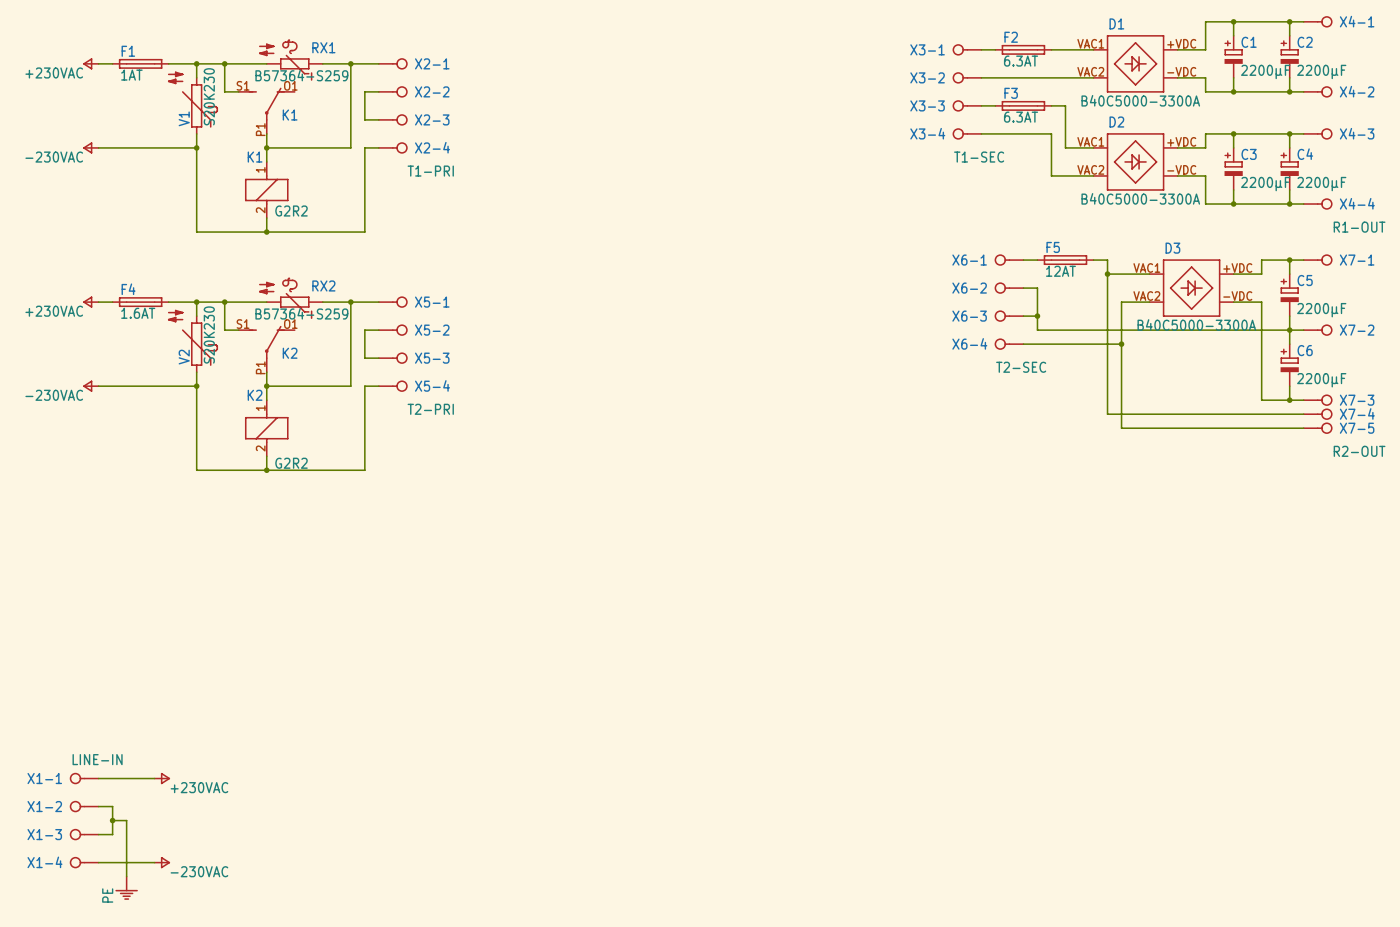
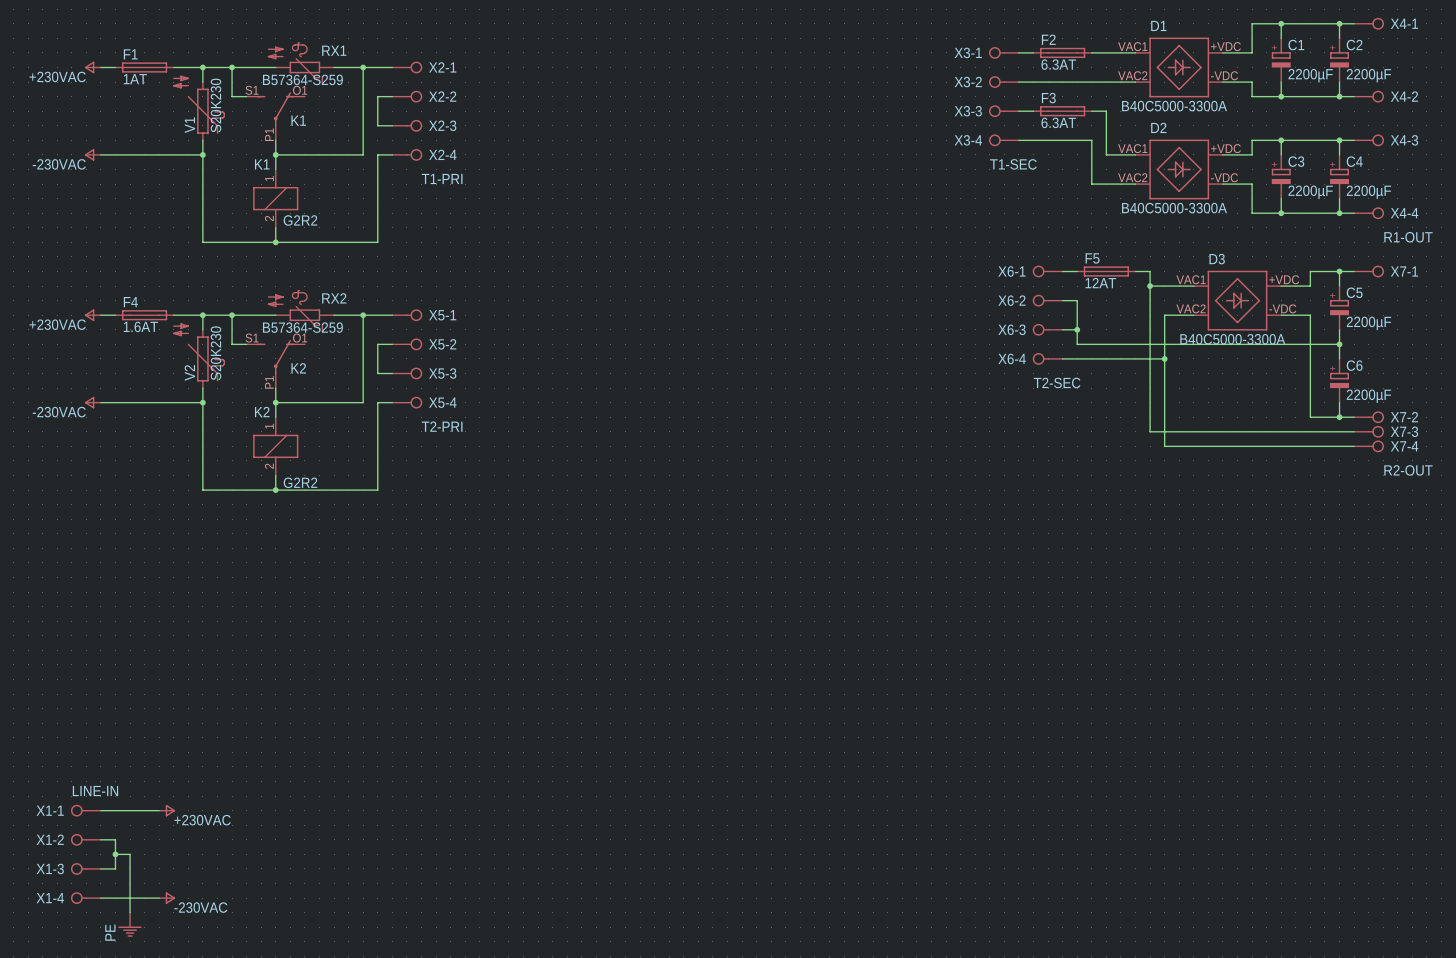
wire: (1289, 330) (1303, 330) -> none
X7-2: (1318, 330) -> none
X7-3 name: X7-3 (1357, 400) -> X7-2 (1404, 417)
X7-4 name: X7-4 (1357, 413) -> X7-3 (1404, 431)
X7-5 name: X7-5 (1357, 428) -> X7-4 (1404, 446)

